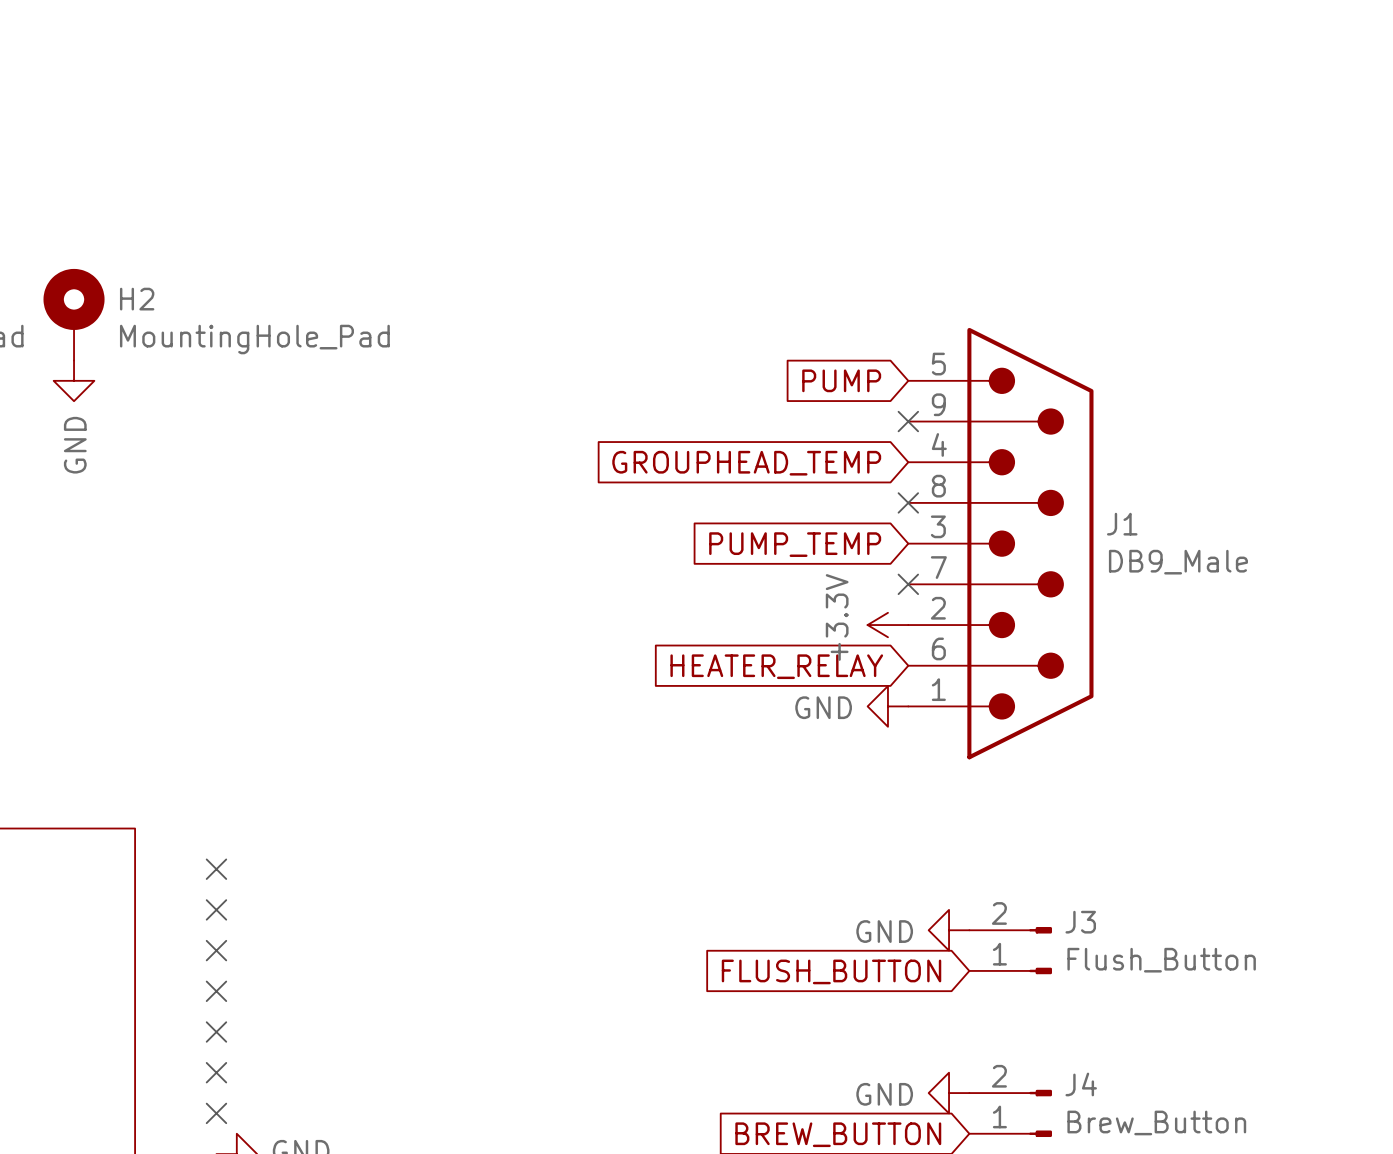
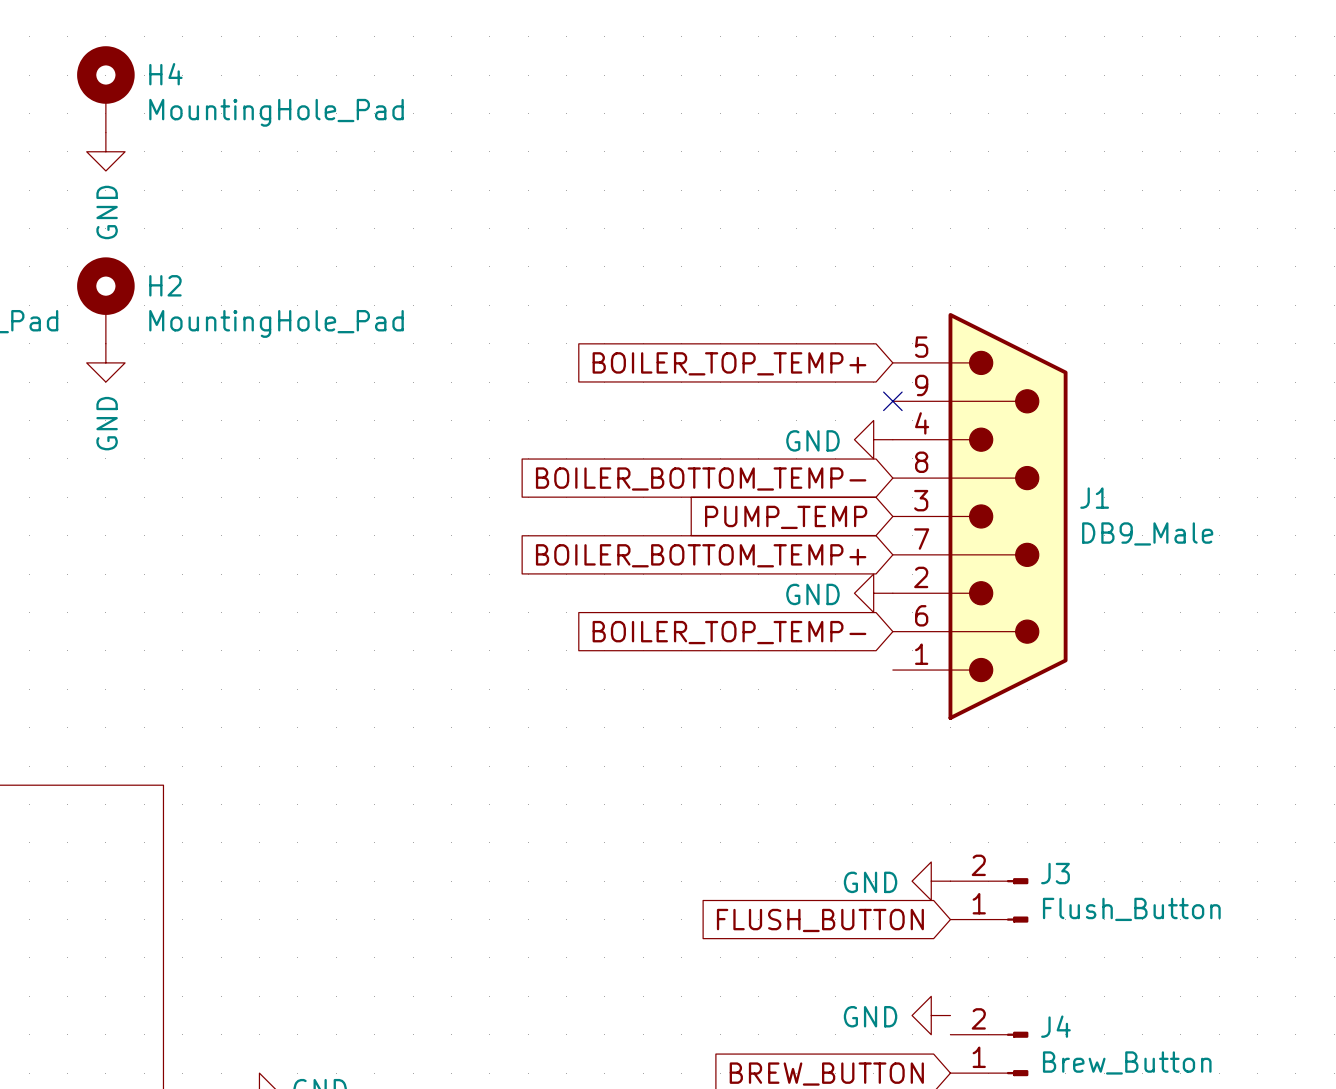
H4: none -> MountingHole_Pad (105, 89)
power symbol: none -> GND (105, 151)
global label: PUMP (841, 380) -> BOILER_TOP_TEMP+ (729, 363)
power symbol: none -> GND (873, 439)
global label: GROUPHEAD_TEMP (746, 463) -> none
no-connect mark: (908, 502) -> none
global label: none -> BOILER_BOTTOM_TEMP- (701, 479)
no-connect mark: (908, 584) -> none
global label: none -> BOILER_BOTTOM_TEMP+ (701, 555)
power symbol: +3.3V (887, 625) -> GND (873, 593)
global label: HEATER_RELAY (776, 666) -> BOILER_TOP_TEMP- (729, 632)
power symbol: GND (887, 706) -> none
no-connect mark: (216, 869) -> none
no-connect mark: (216, 909) -> none
no-connect mark: (216, 950) -> none
no-connect mark: (216, 991) -> none
no-connect mark: (216, 1032) -> none
no-connect mark: (216, 1072) -> none
power symbol position: GND (949, 1093) -> GND (931, 1015)
no-connect mark: (216, 1113) -> none

